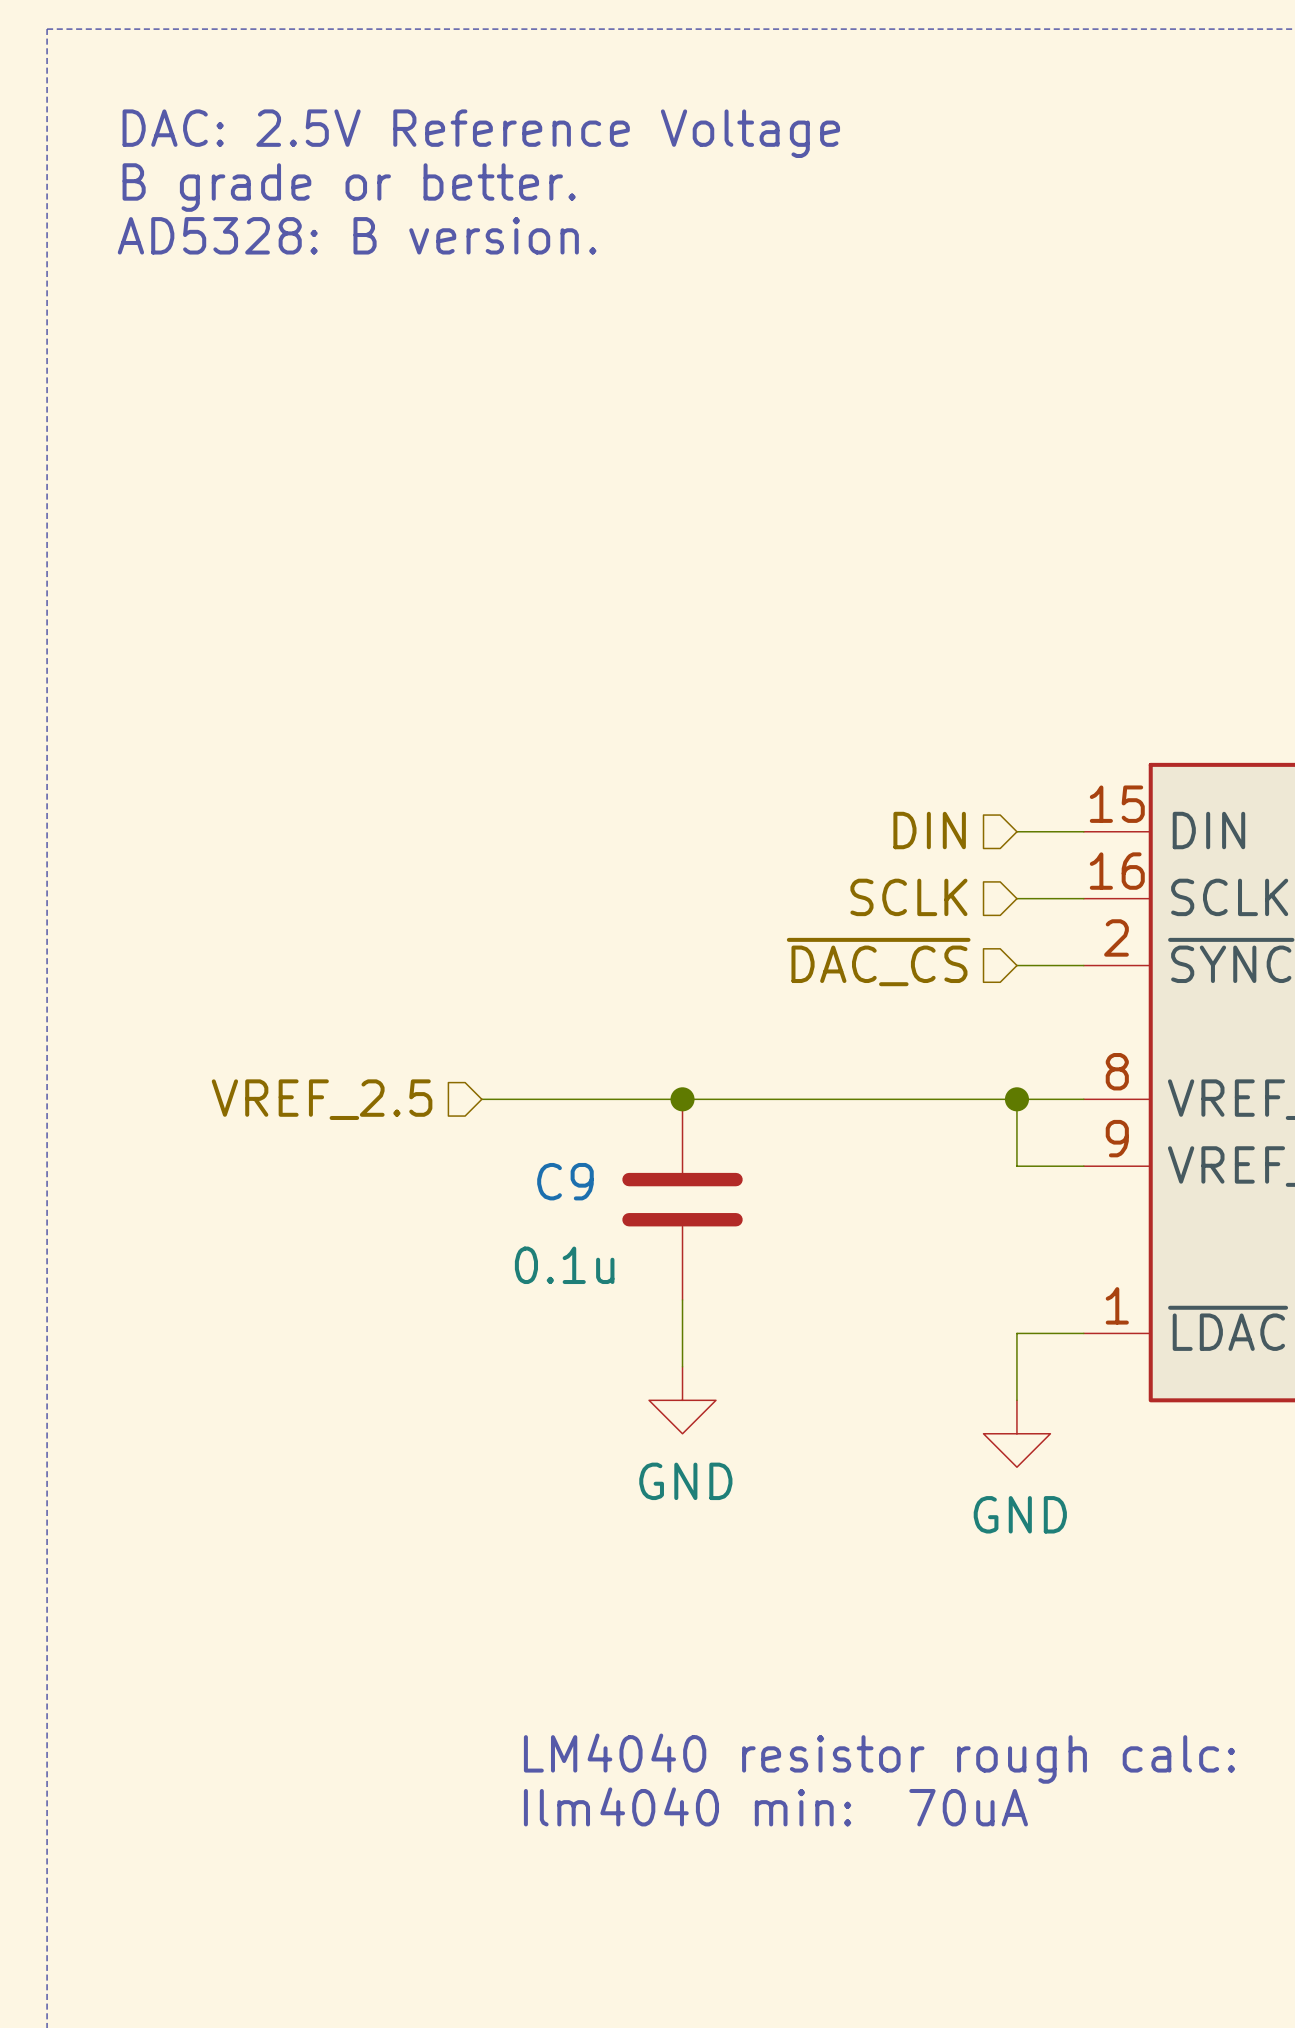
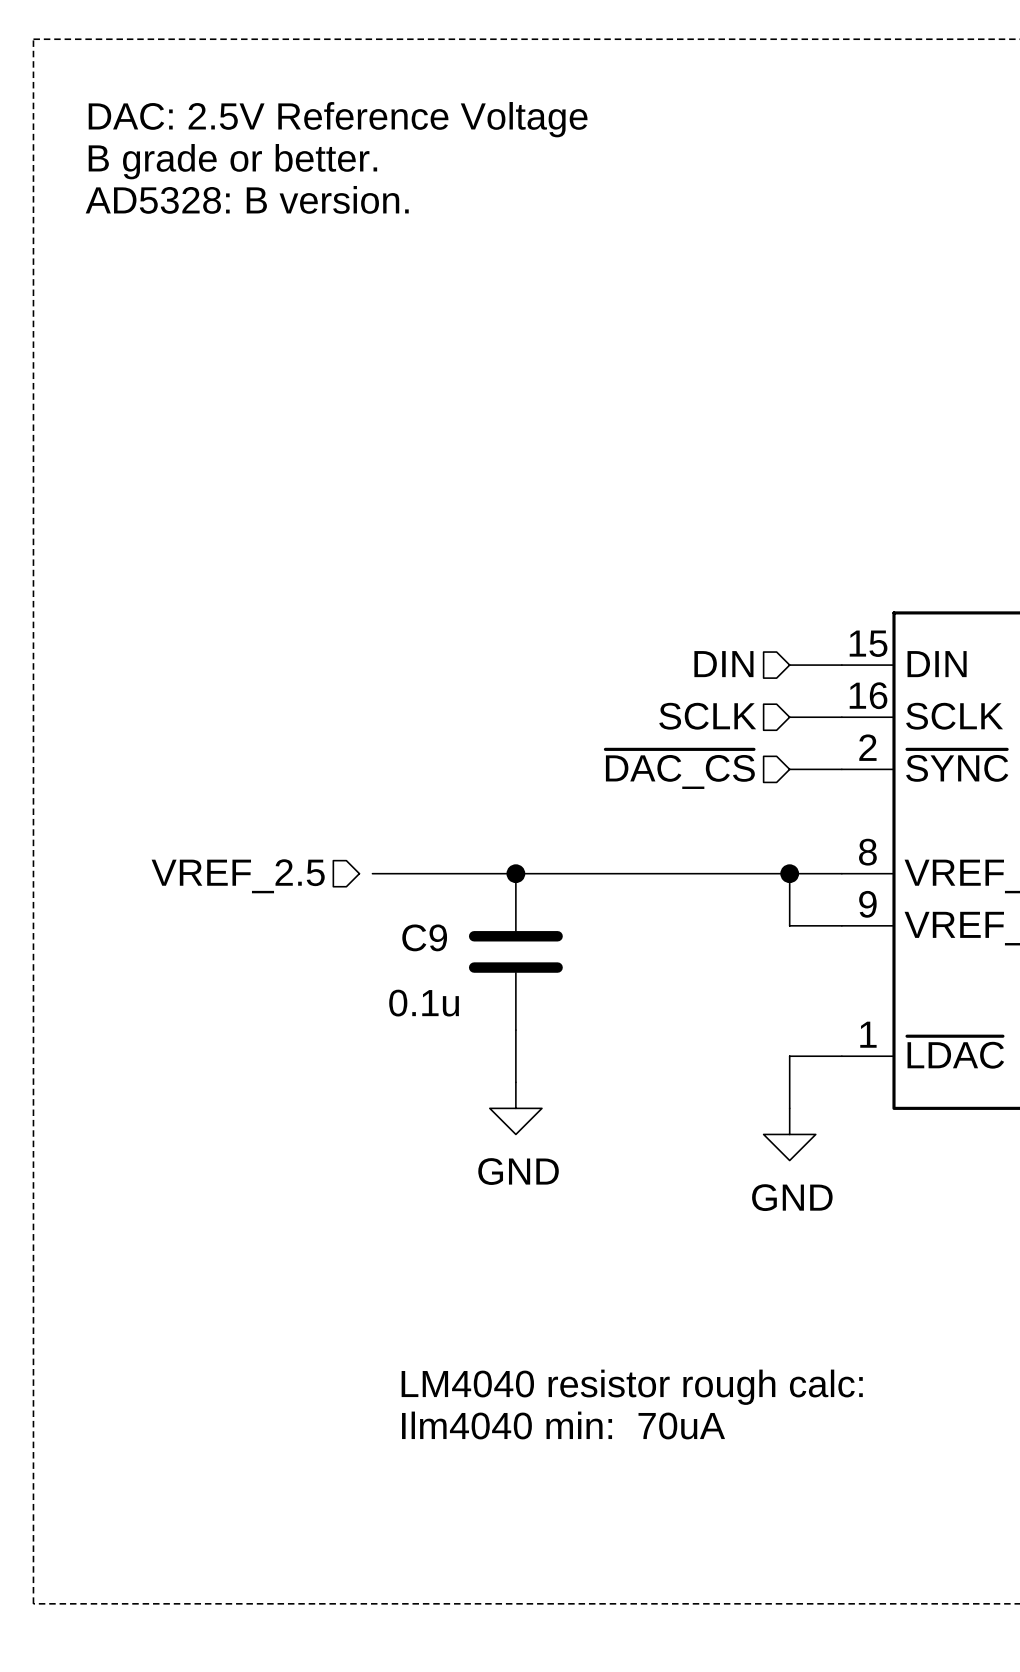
hierarchical label position: VREF_2.5 (322, 1099) -> VREF_2.5 (238, 876)
junction position: (682, 1099) -> (515, 873)
C9 position: (682, 1199) -> (515, 951)
wire: (682, 1299) (682, 1366) -> (515, 1030) (515, 1082)
power symbol position: GND (682, 1400) -> GND (515, 1108)

